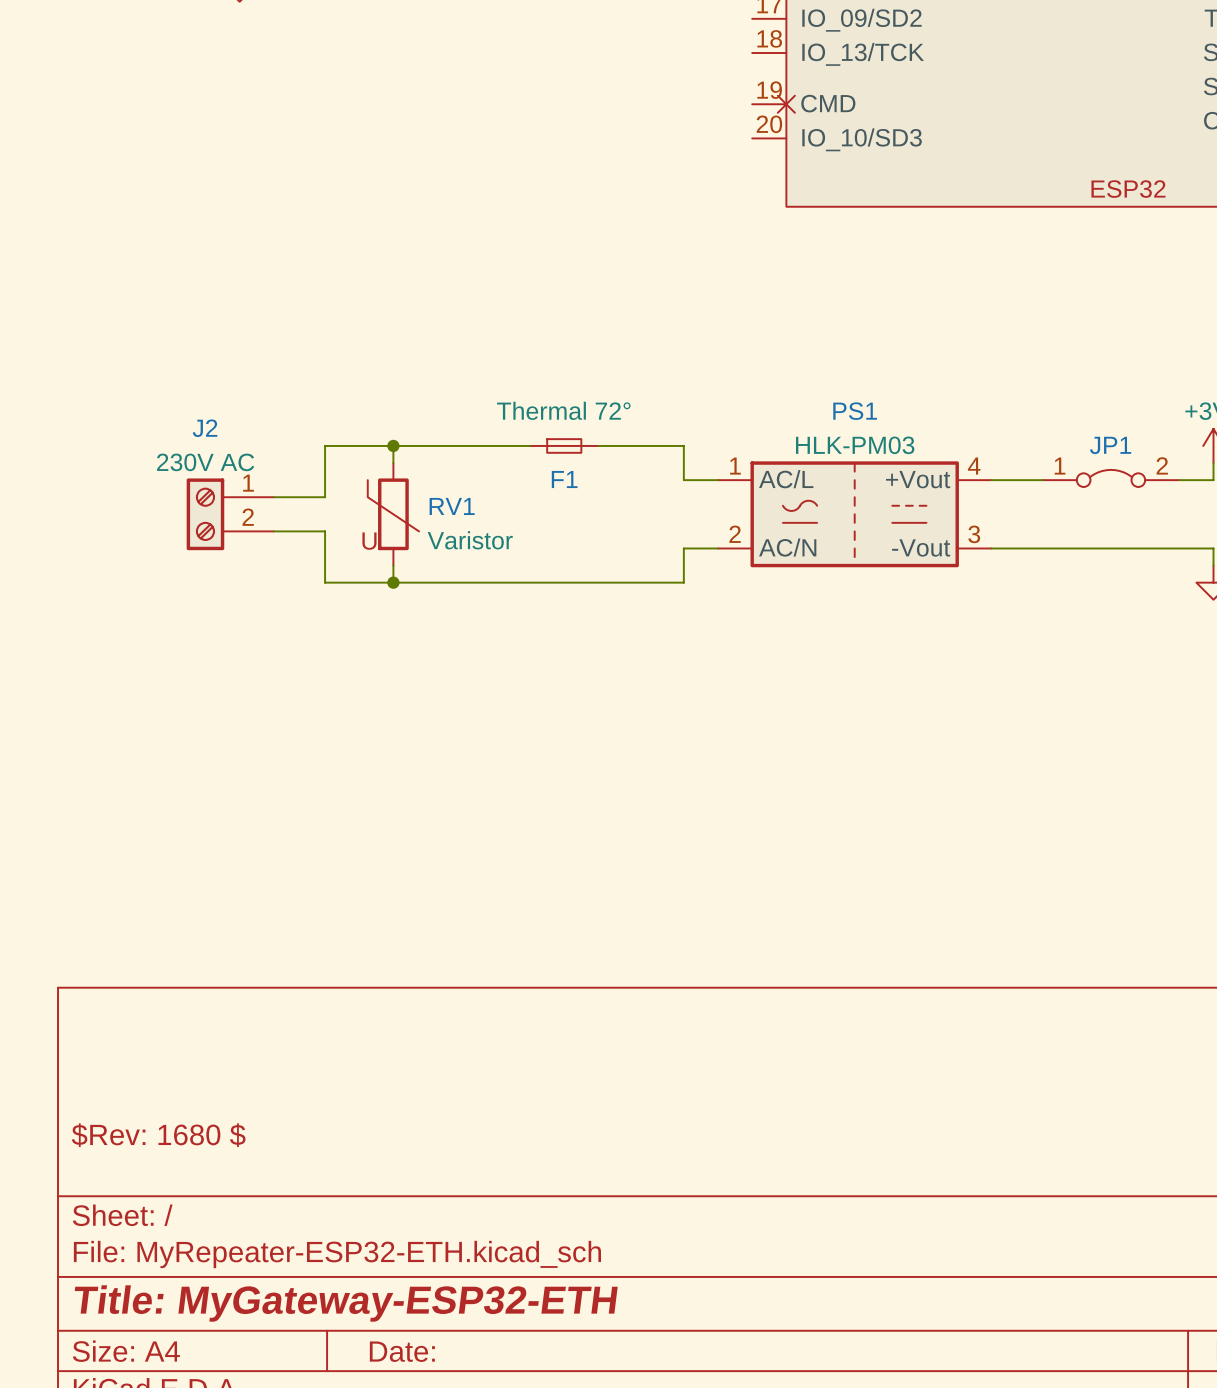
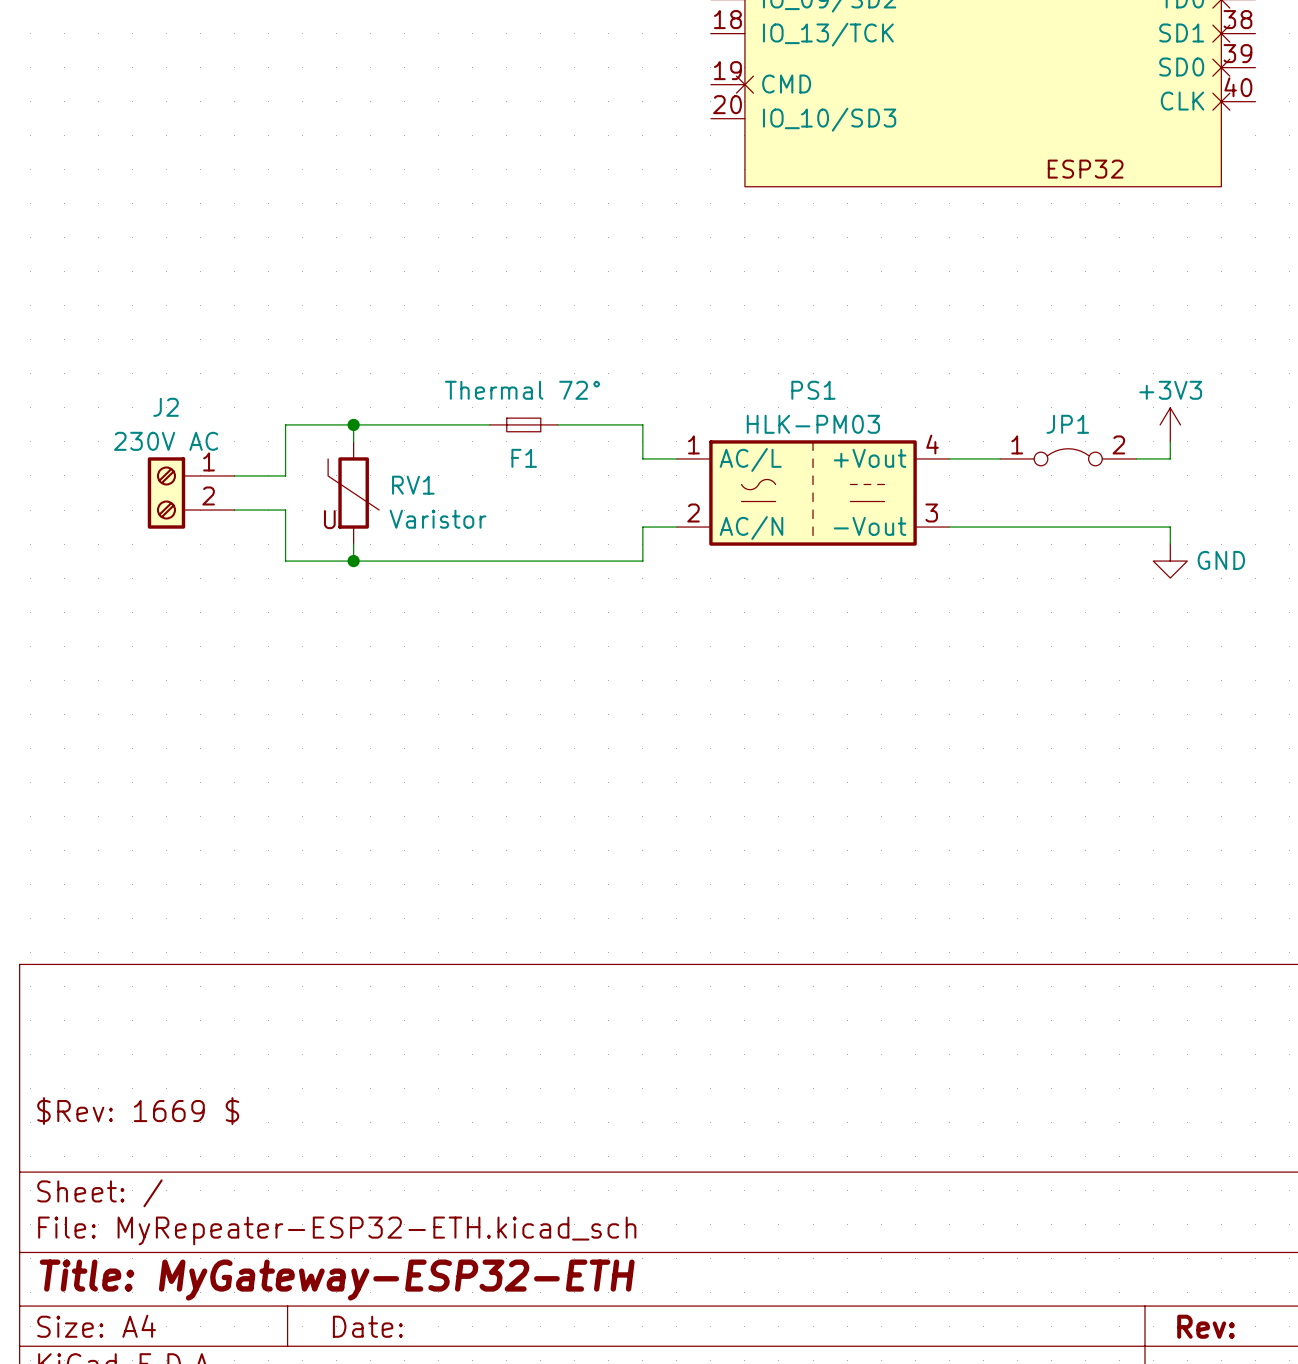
title block: $Rev: 1680 $ (158, 1135) -> $Rev: 1669 $ (138, 1111)

